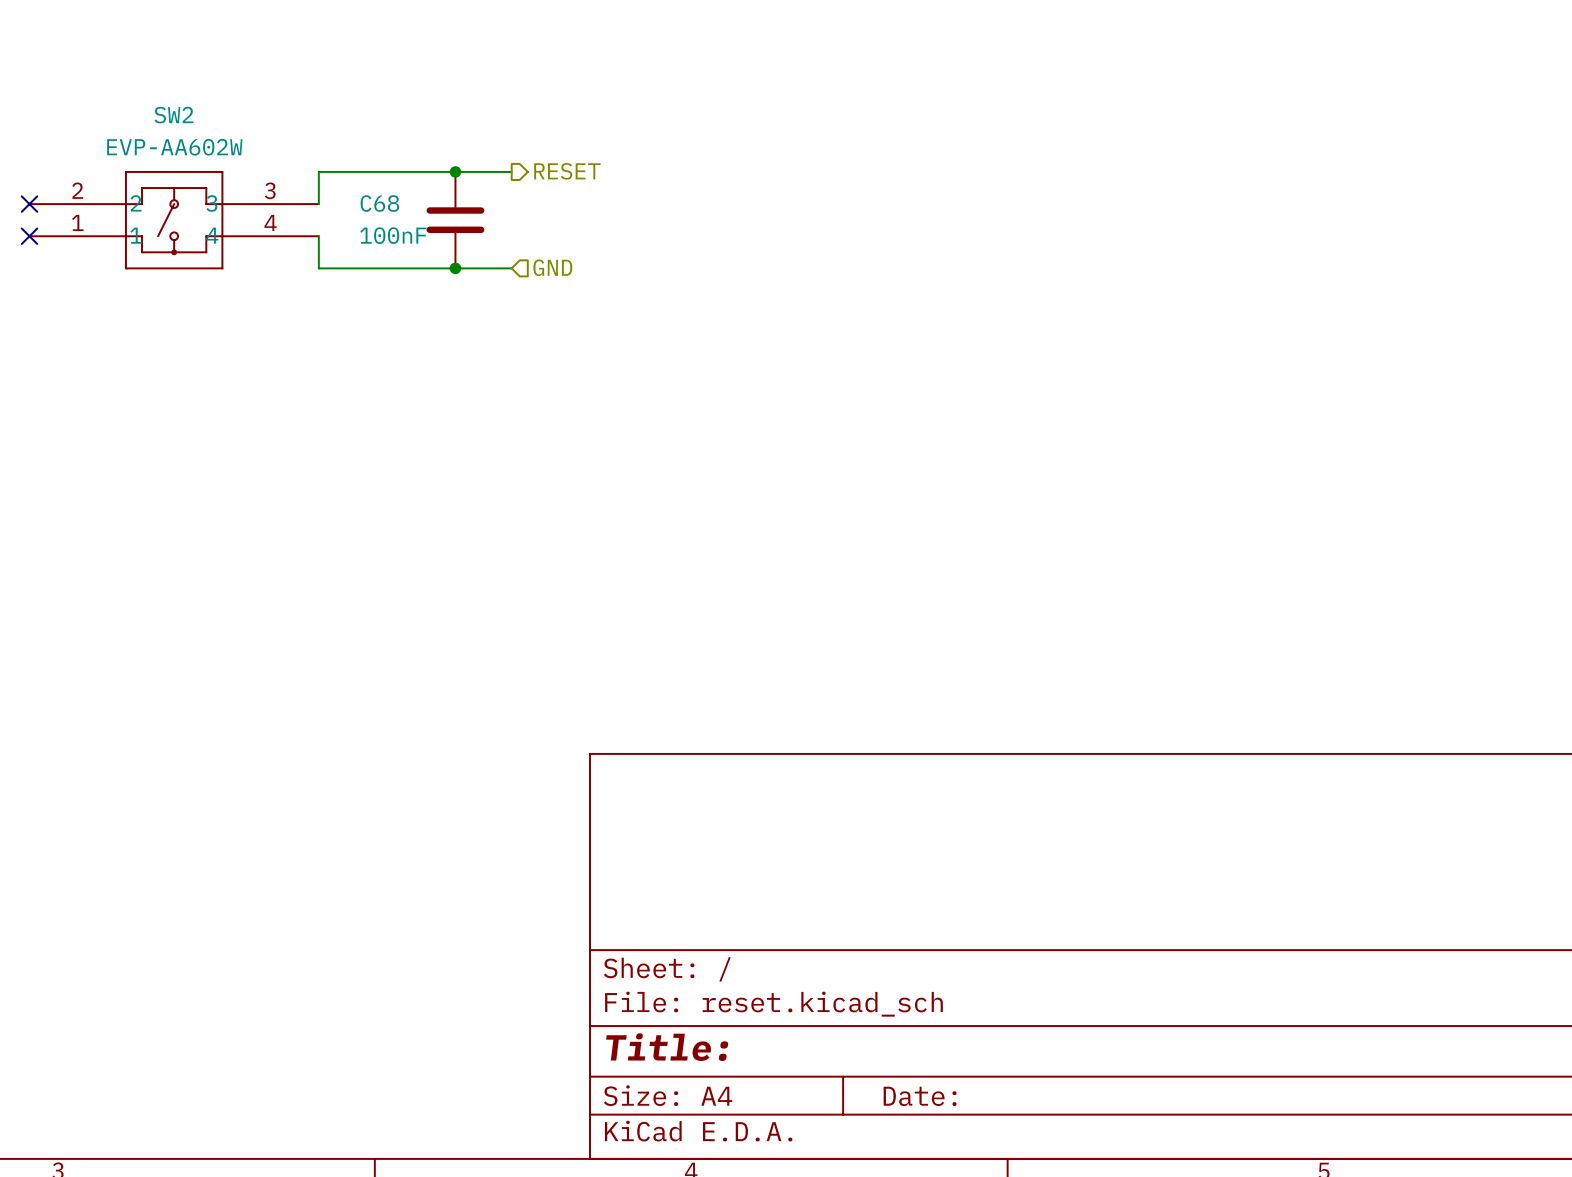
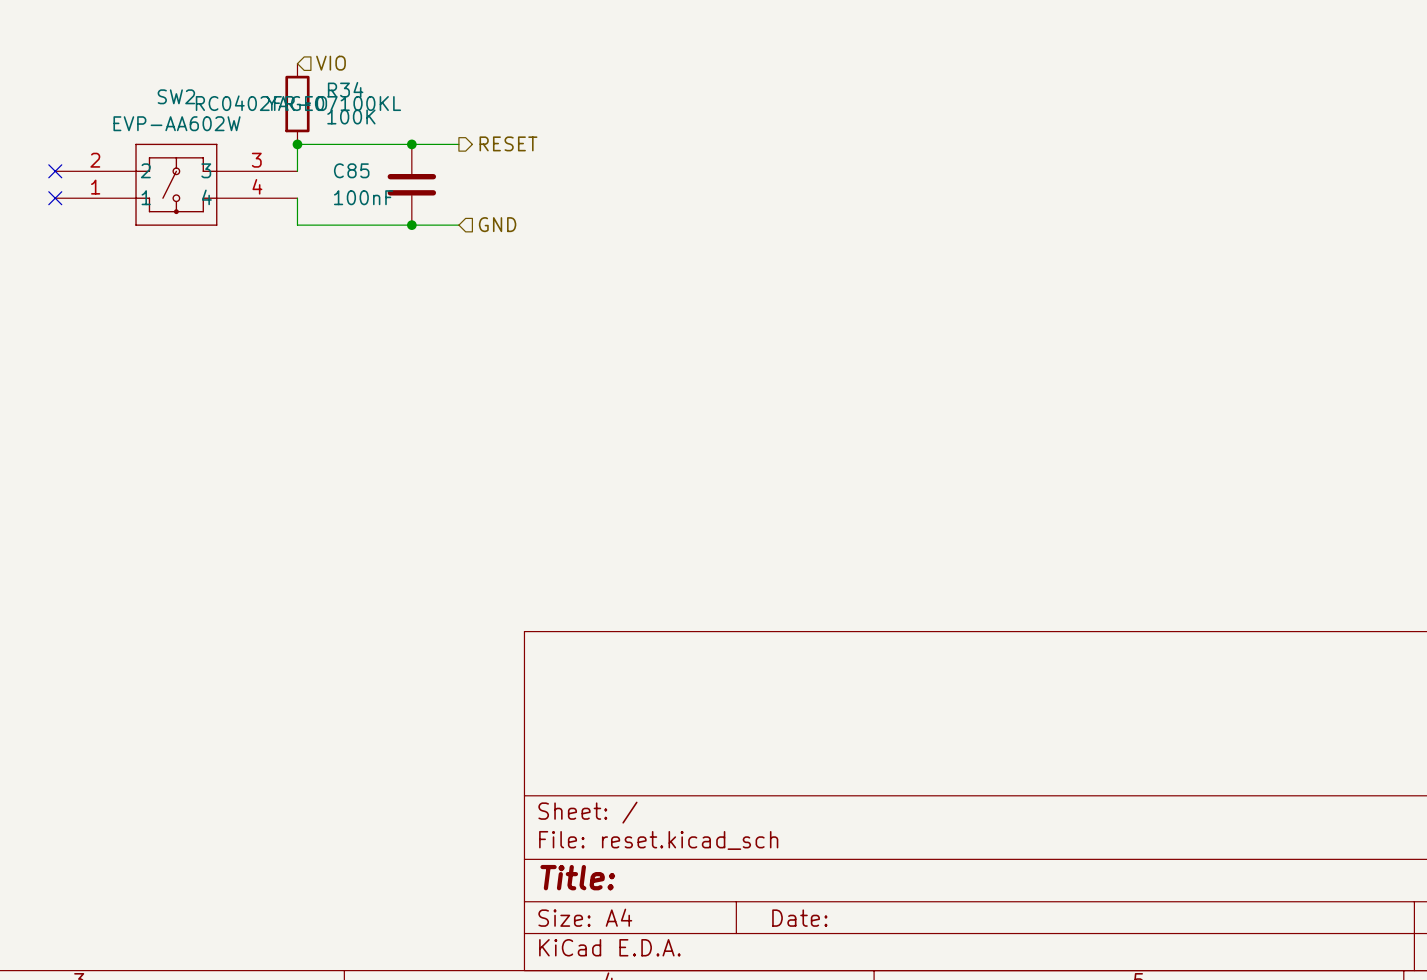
hierarchical label: none -> VIO (331, 63)
R34: none -> 100K (297, 104)
junction: none -> (297, 144)
C68 name: C68 (379, 203) -> C85 (351, 170)

